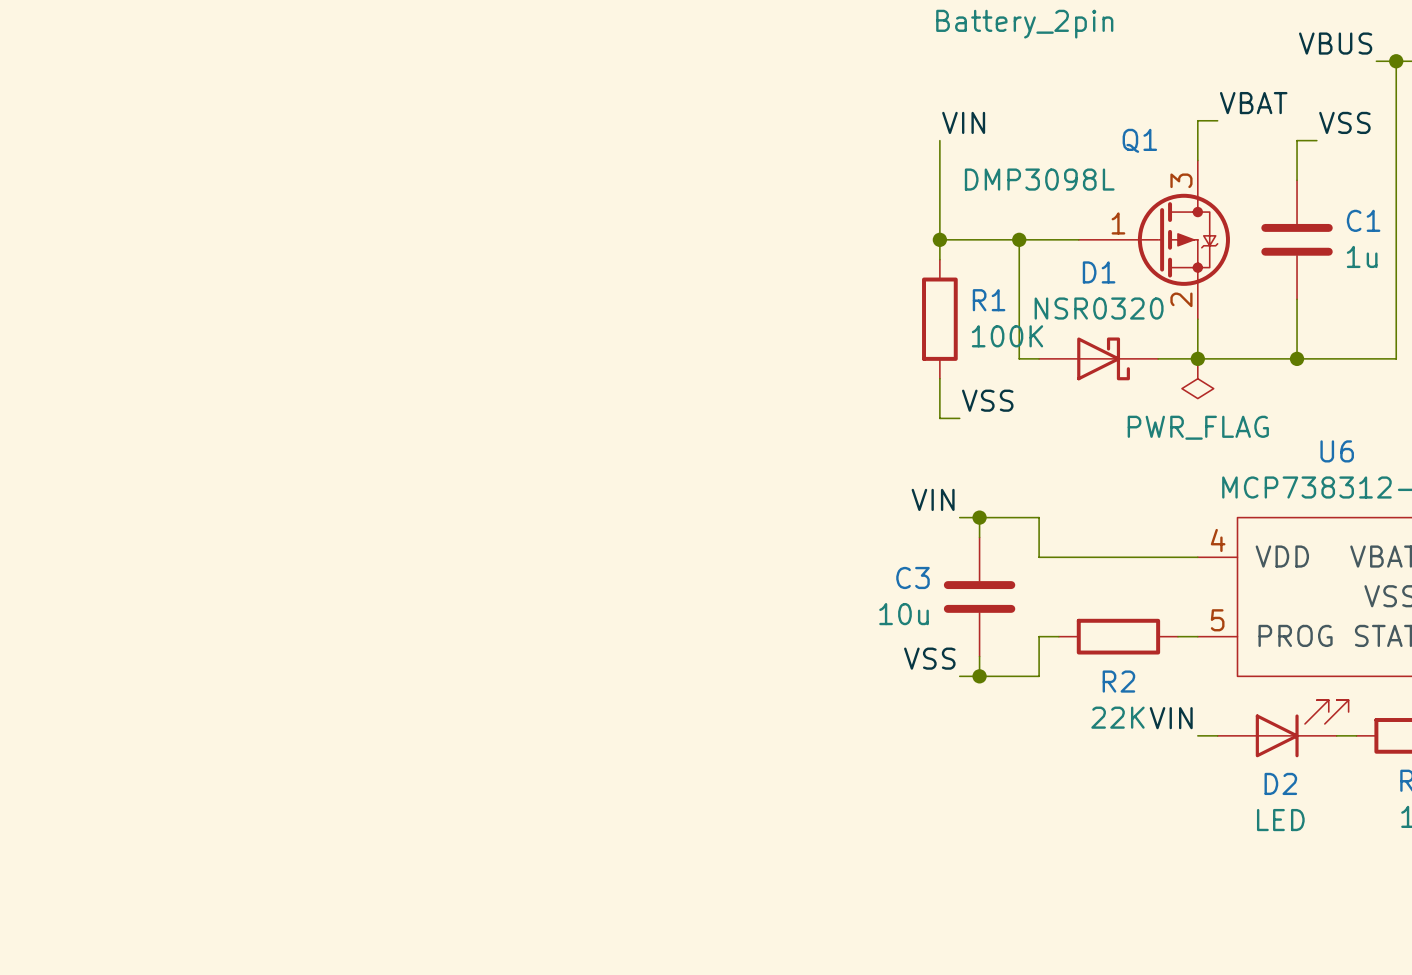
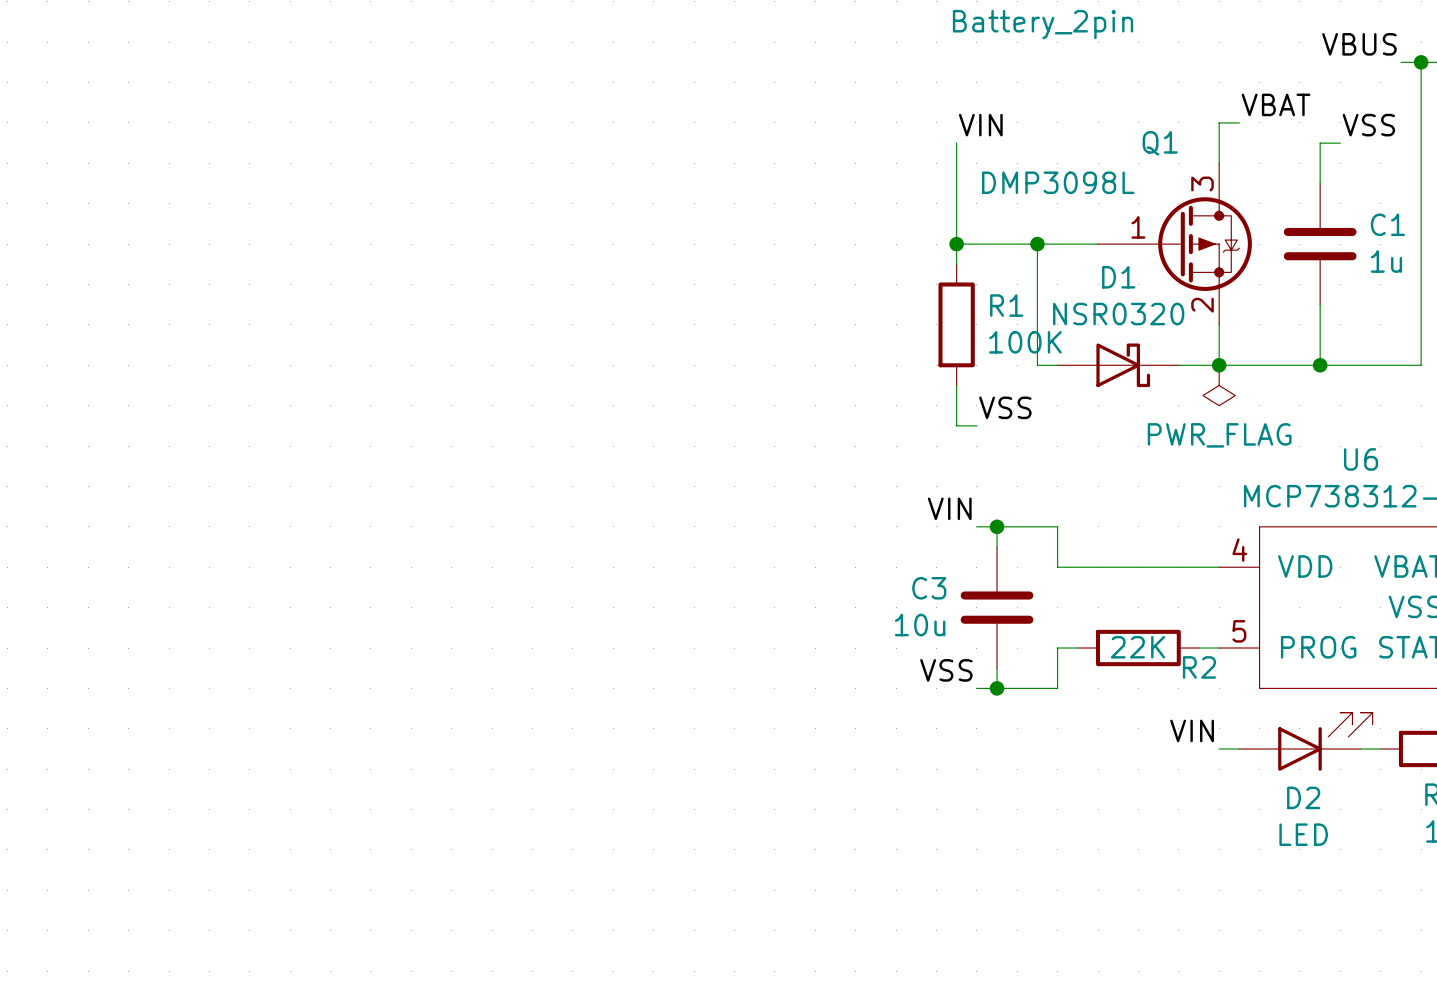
R2 name position: R2 (1118, 681) -> R2 (1199, 667)
R2 value position: 22K (1117, 717) -> 22K (1137, 647)

